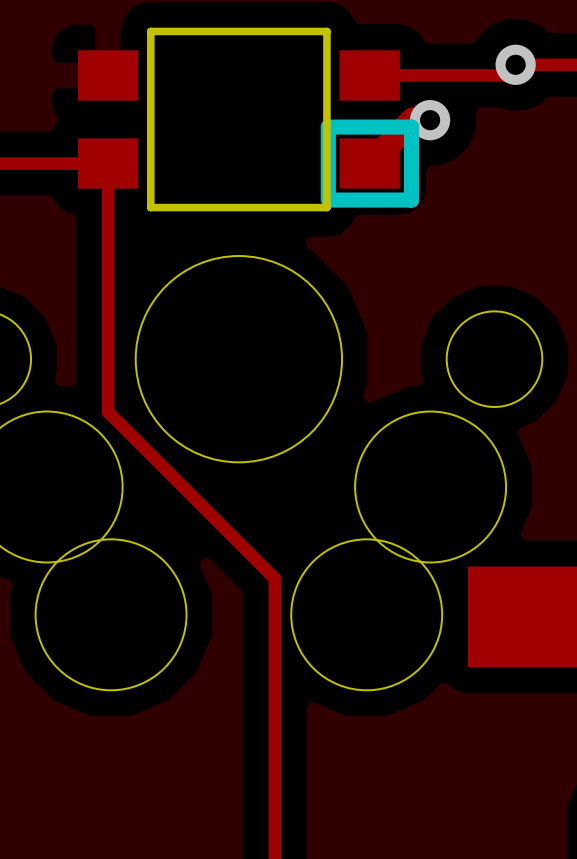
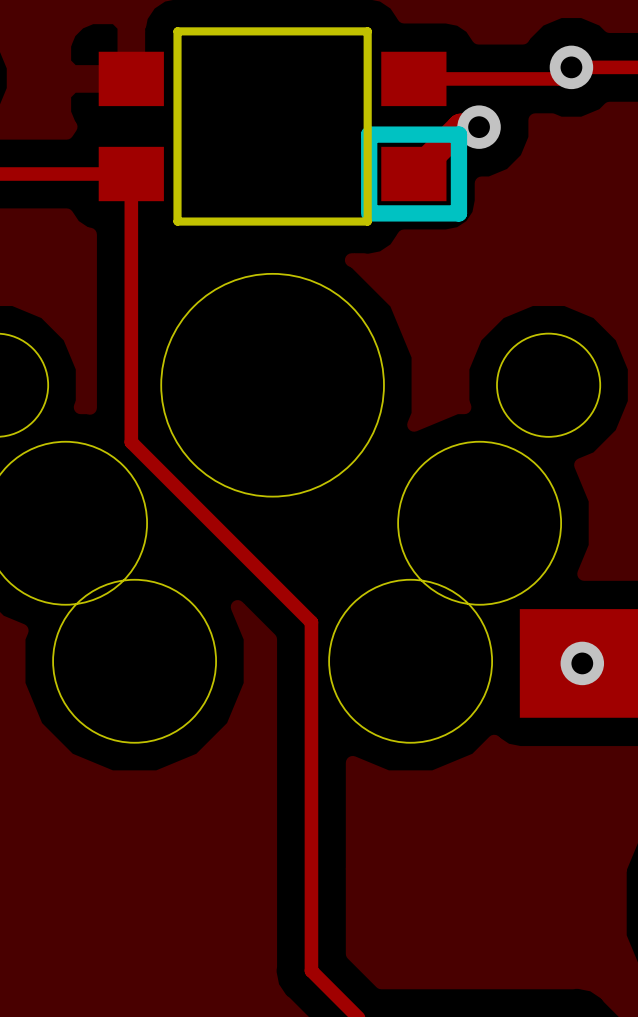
via: none -> (582, 663)

